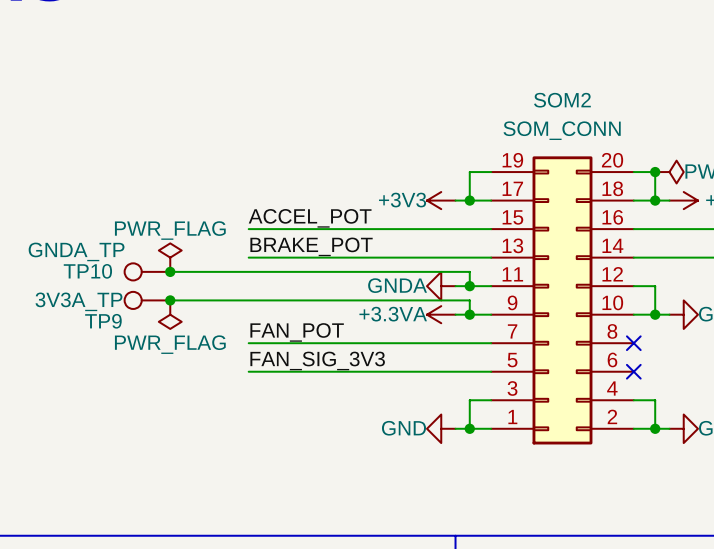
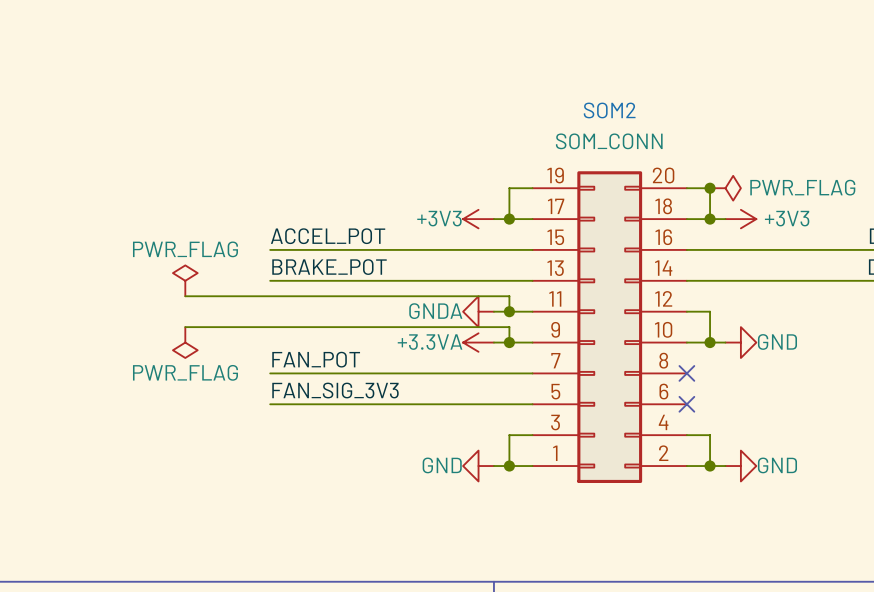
TP10: GNDA_TP (147, 271) -> none
junction: (170, 271) -> none
TP9: 3V3A_TP (147, 300) -> none
junction: (170, 300) -> none

